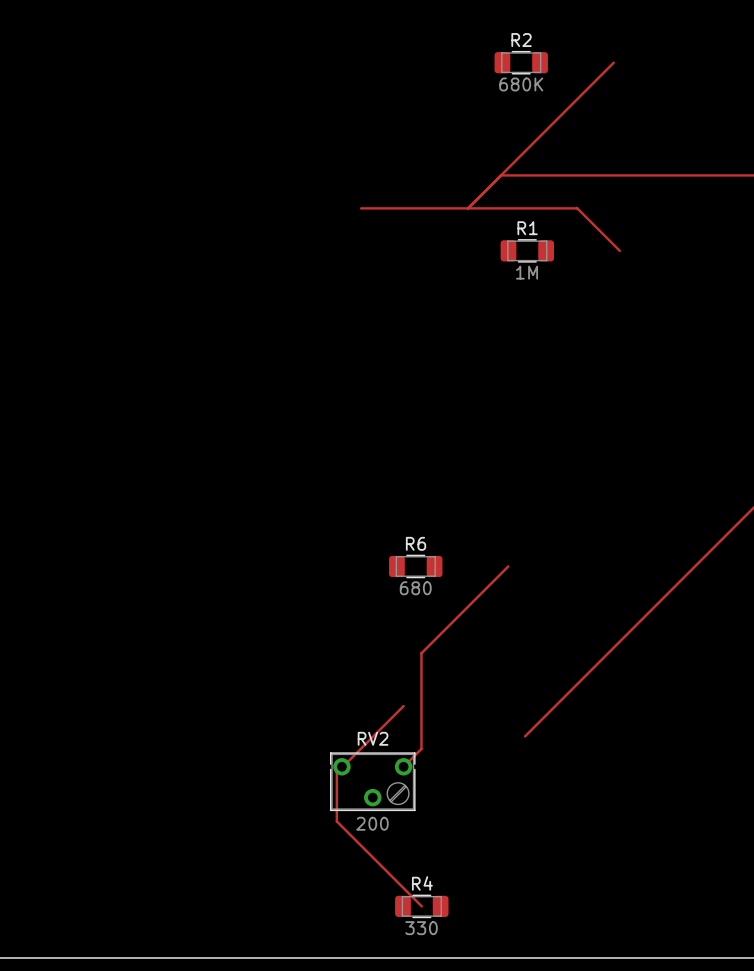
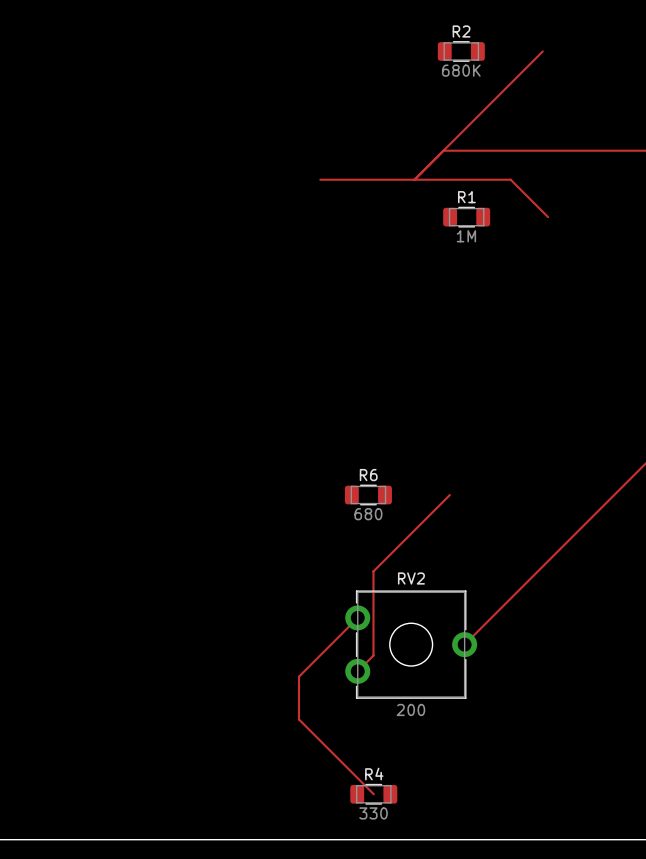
RV2 name position: RV2 (373, 738) -> RV2 (411, 578)
RV2 footprint: [329, 752, 416, 812] -> [345, 590, 478, 699]
RV2 value position: 200 (372, 823) -> 200 (410, 709)

